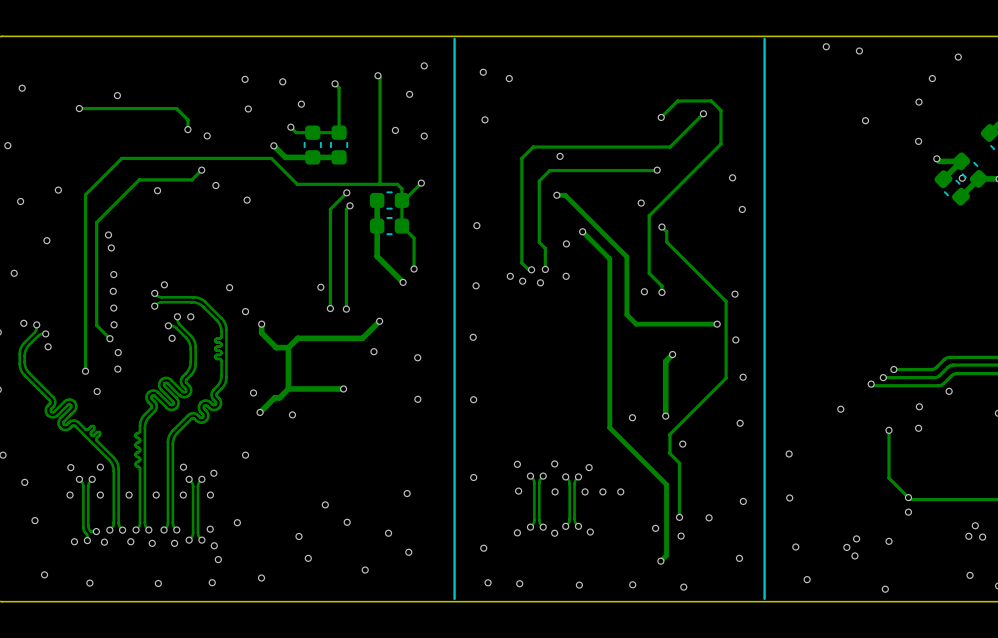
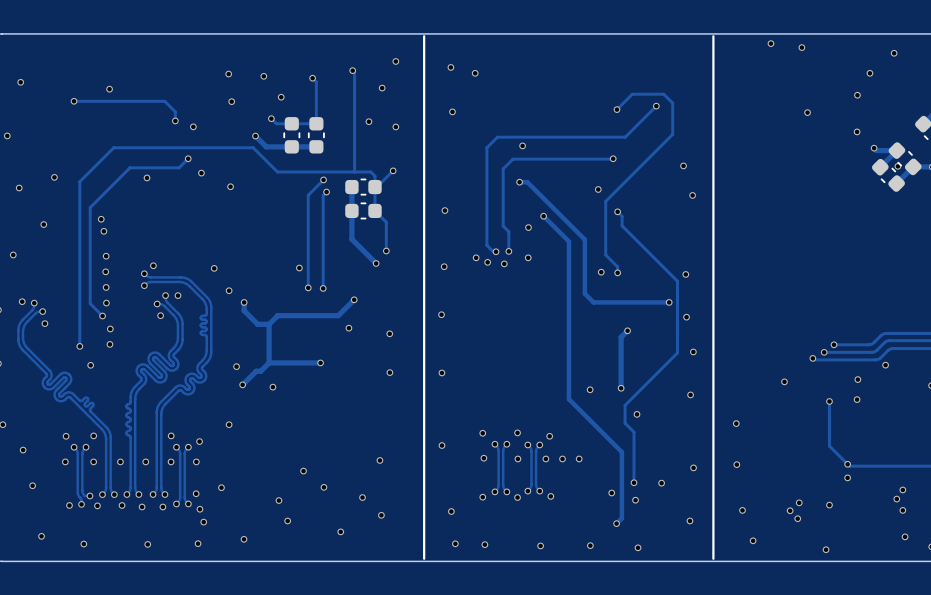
via: none -> (902, 489)
via: (975, 525) -> none
via: none -> (896, 499)
via: (968, 536) -> none
via: (982, 537) -> none
via: none -> (902, 510)

